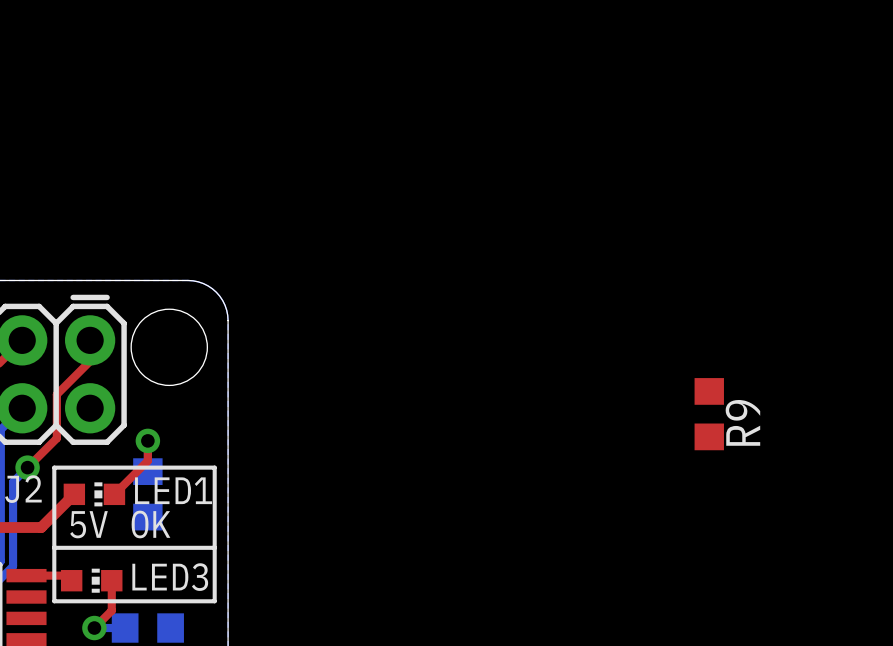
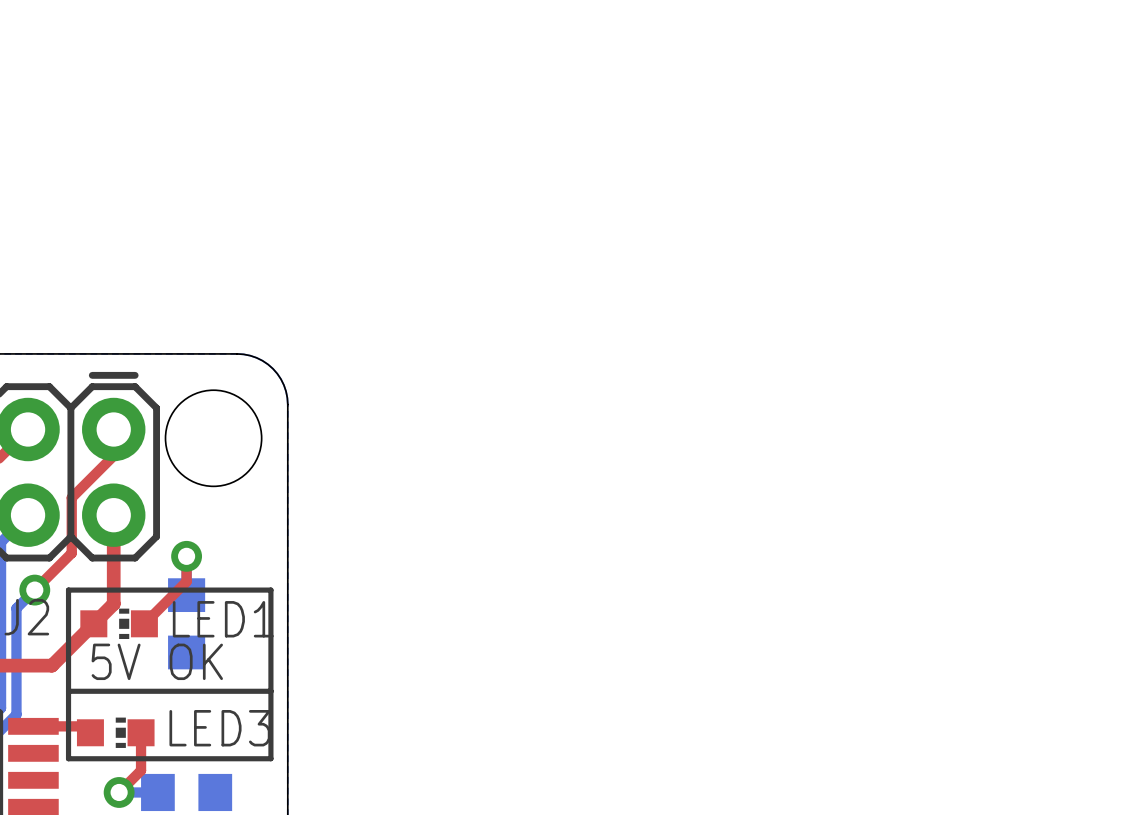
top track: none -> (113, 515) (113, 603) (93, 623)
R9: (709, 414) -> none

